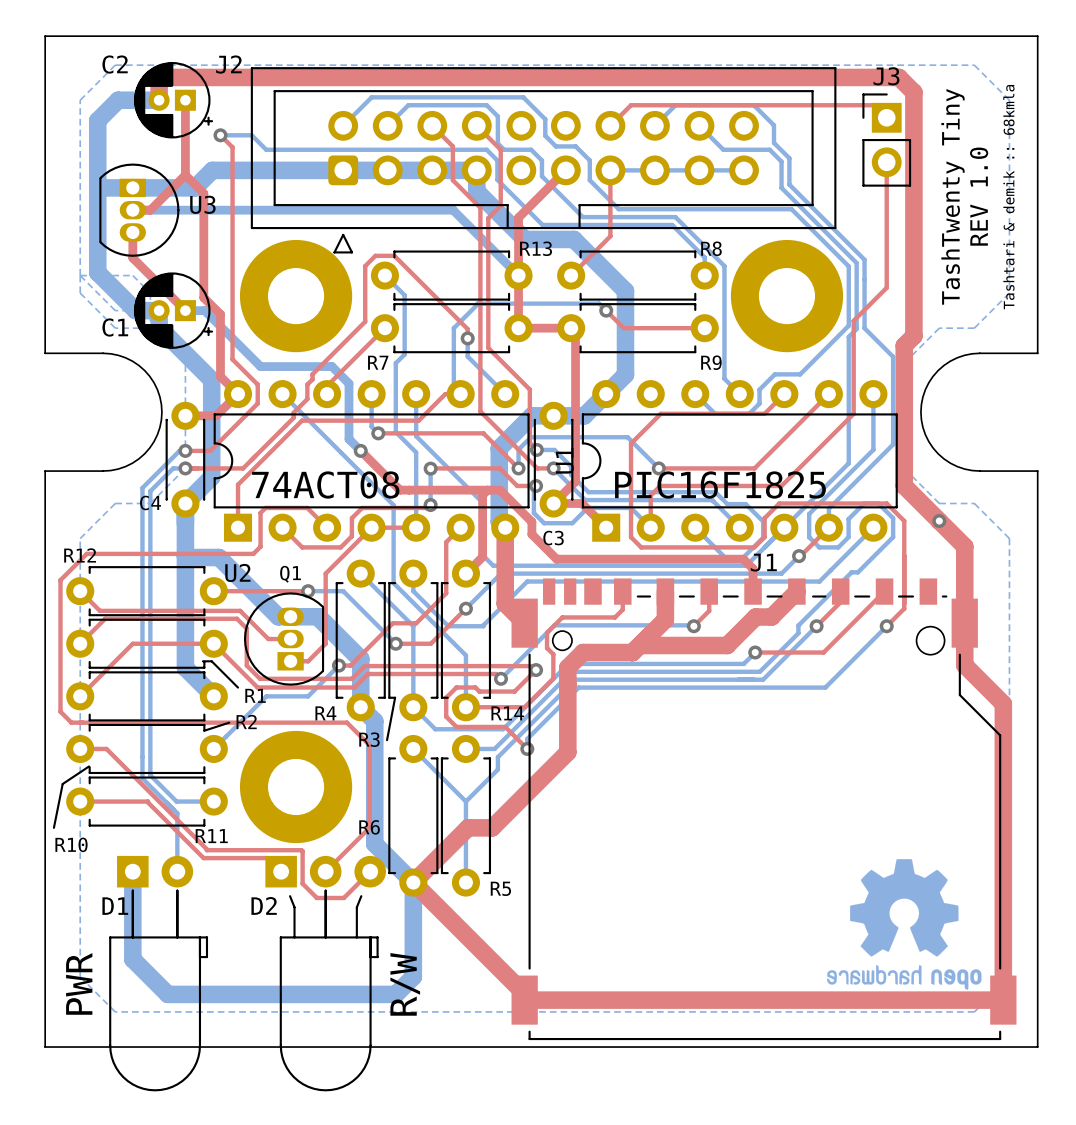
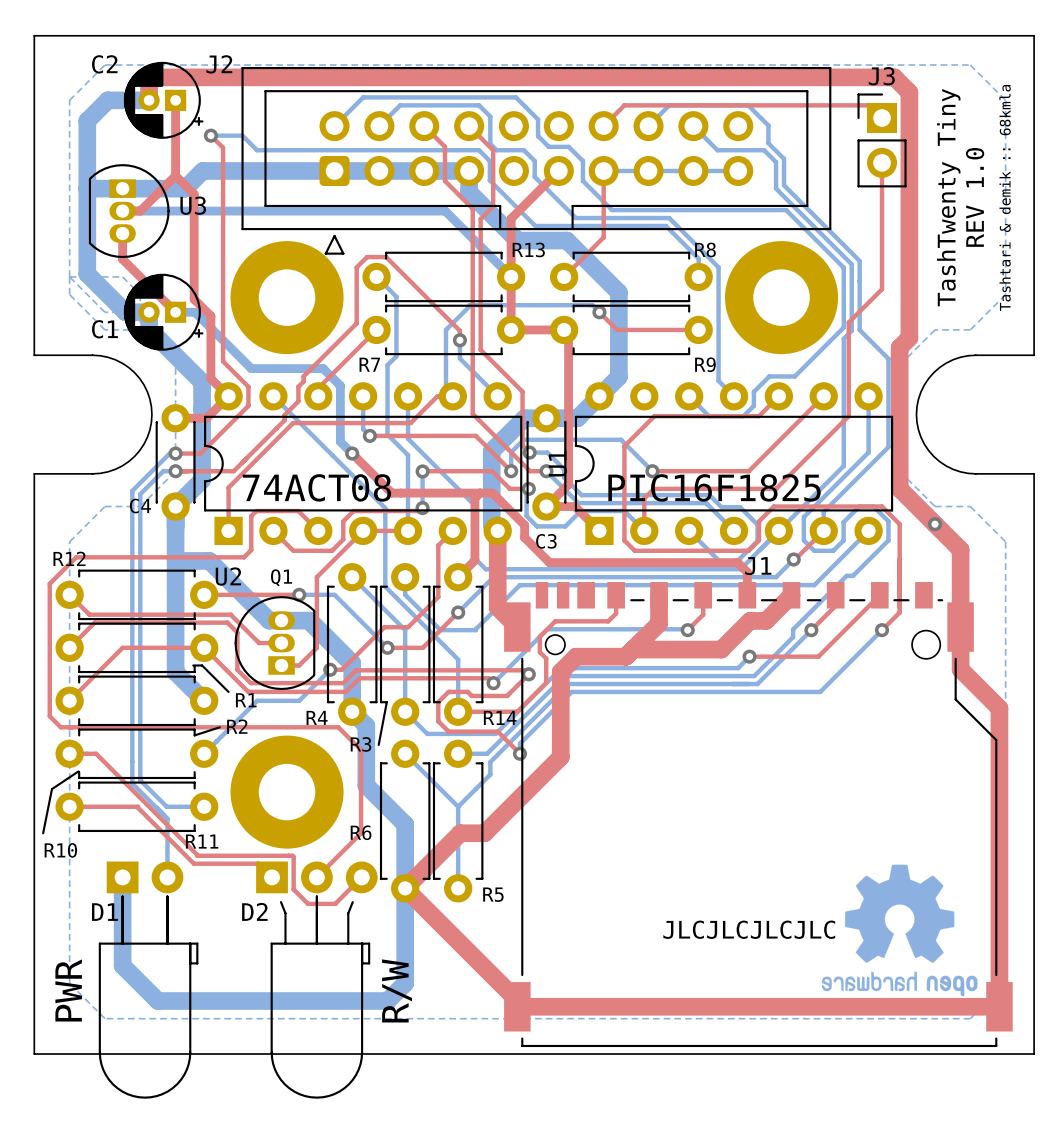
bottom track: (374, 780) (374, 843) (413, 882) -> (366, 785) (405, 824) (405, 888)
text: none -> JLCJLCJLCJLC (749, 929)

